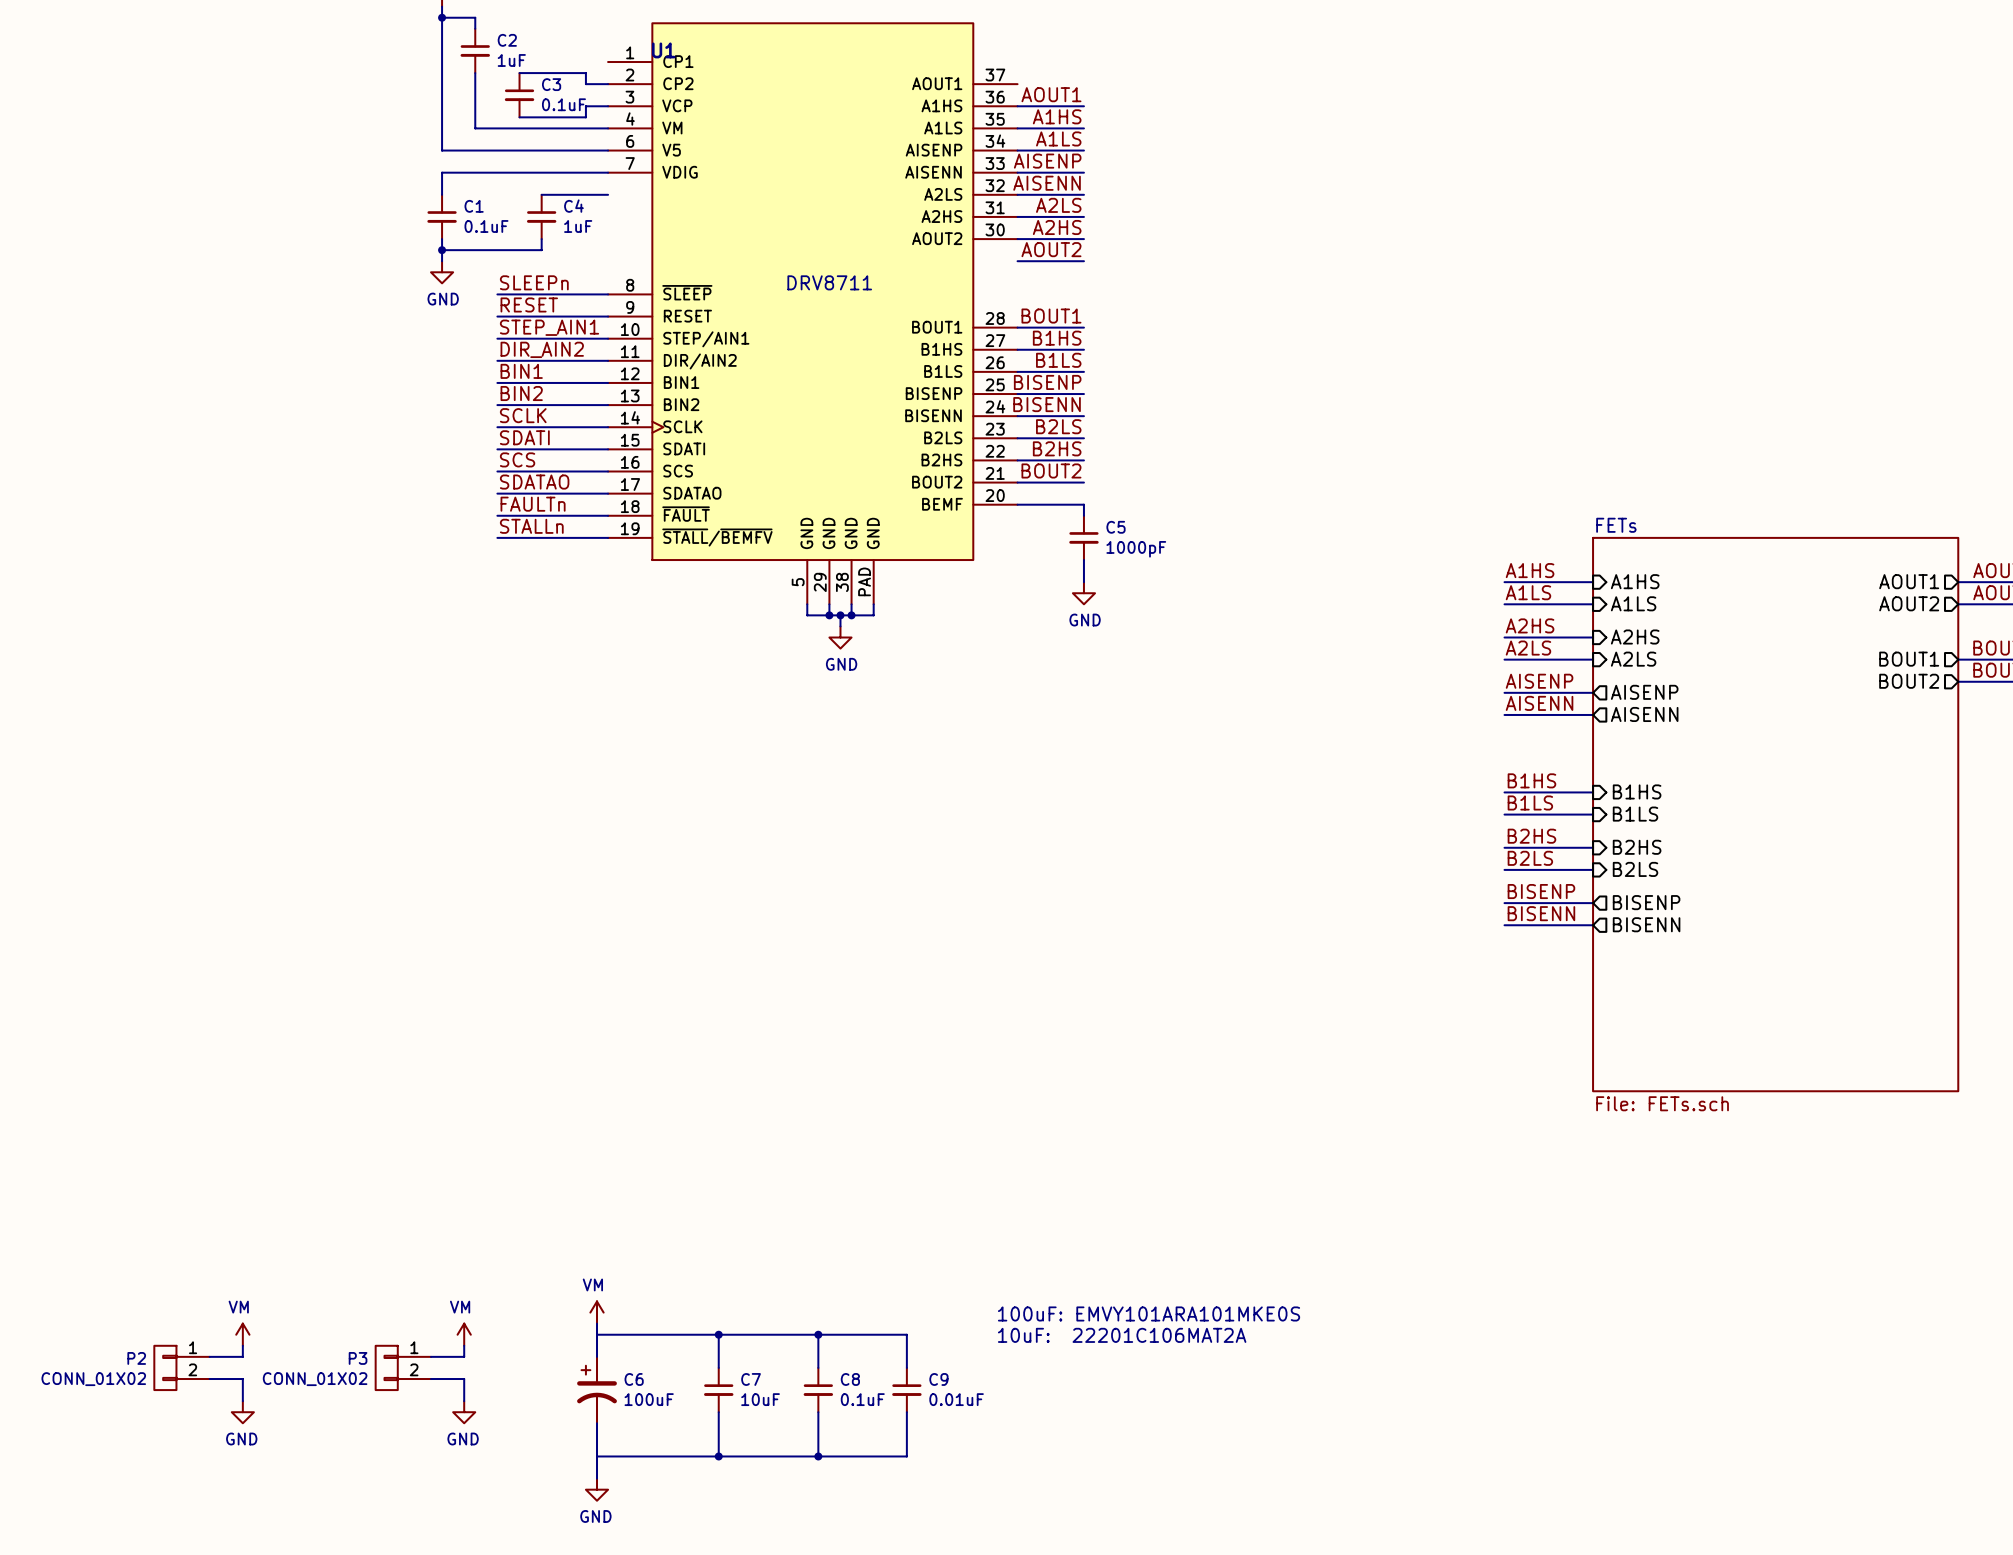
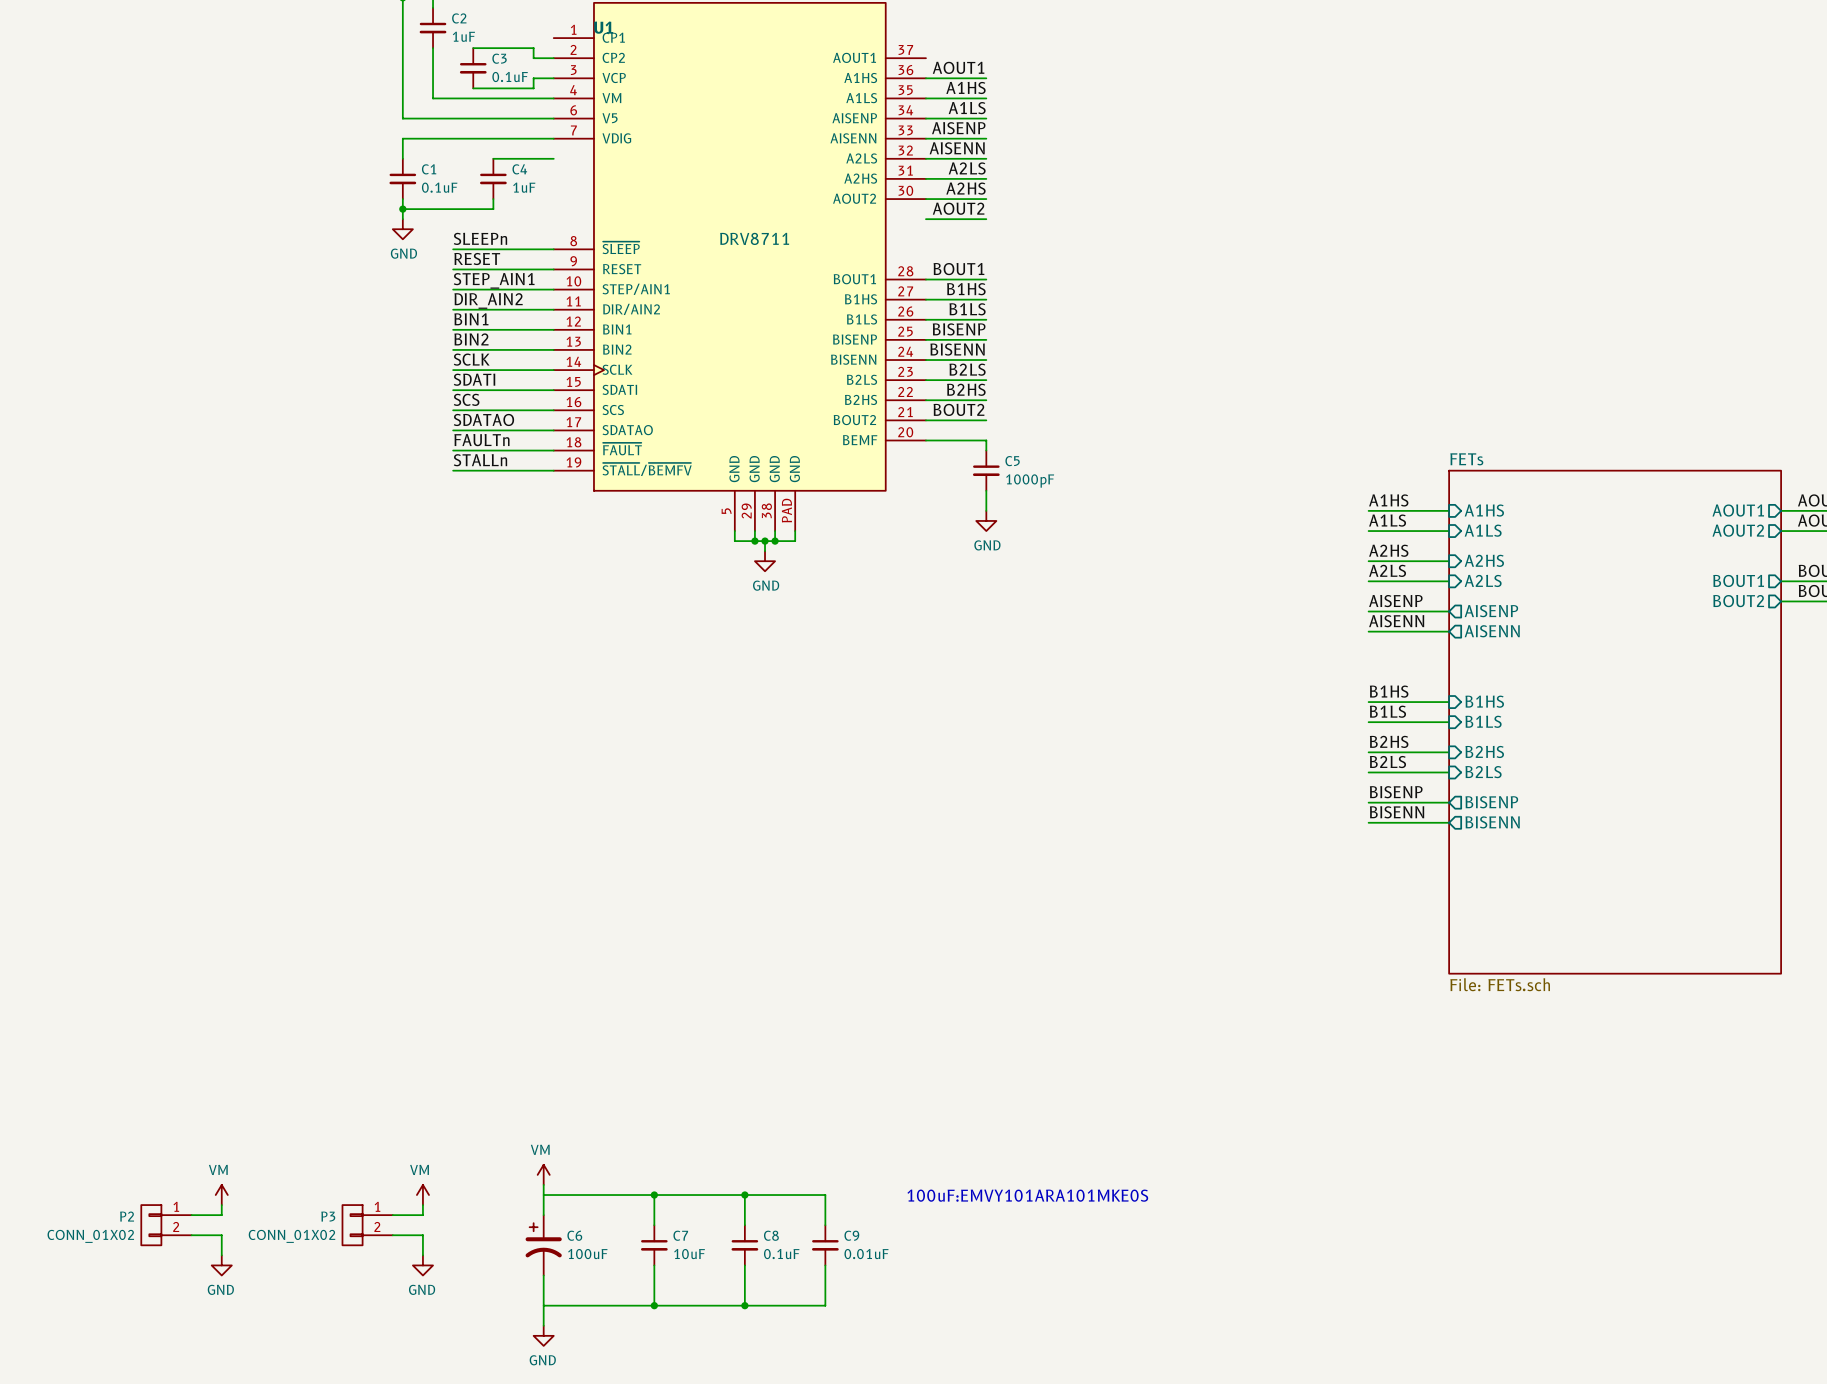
text: 100uF: EMVY101ARA101MKE0S (1149, 1313) -> none
text: 10uF: 22201C106MAT2A (1122, 1335) -> 100uF:EMVY101ARA101MKE0S (1027, 1195)

